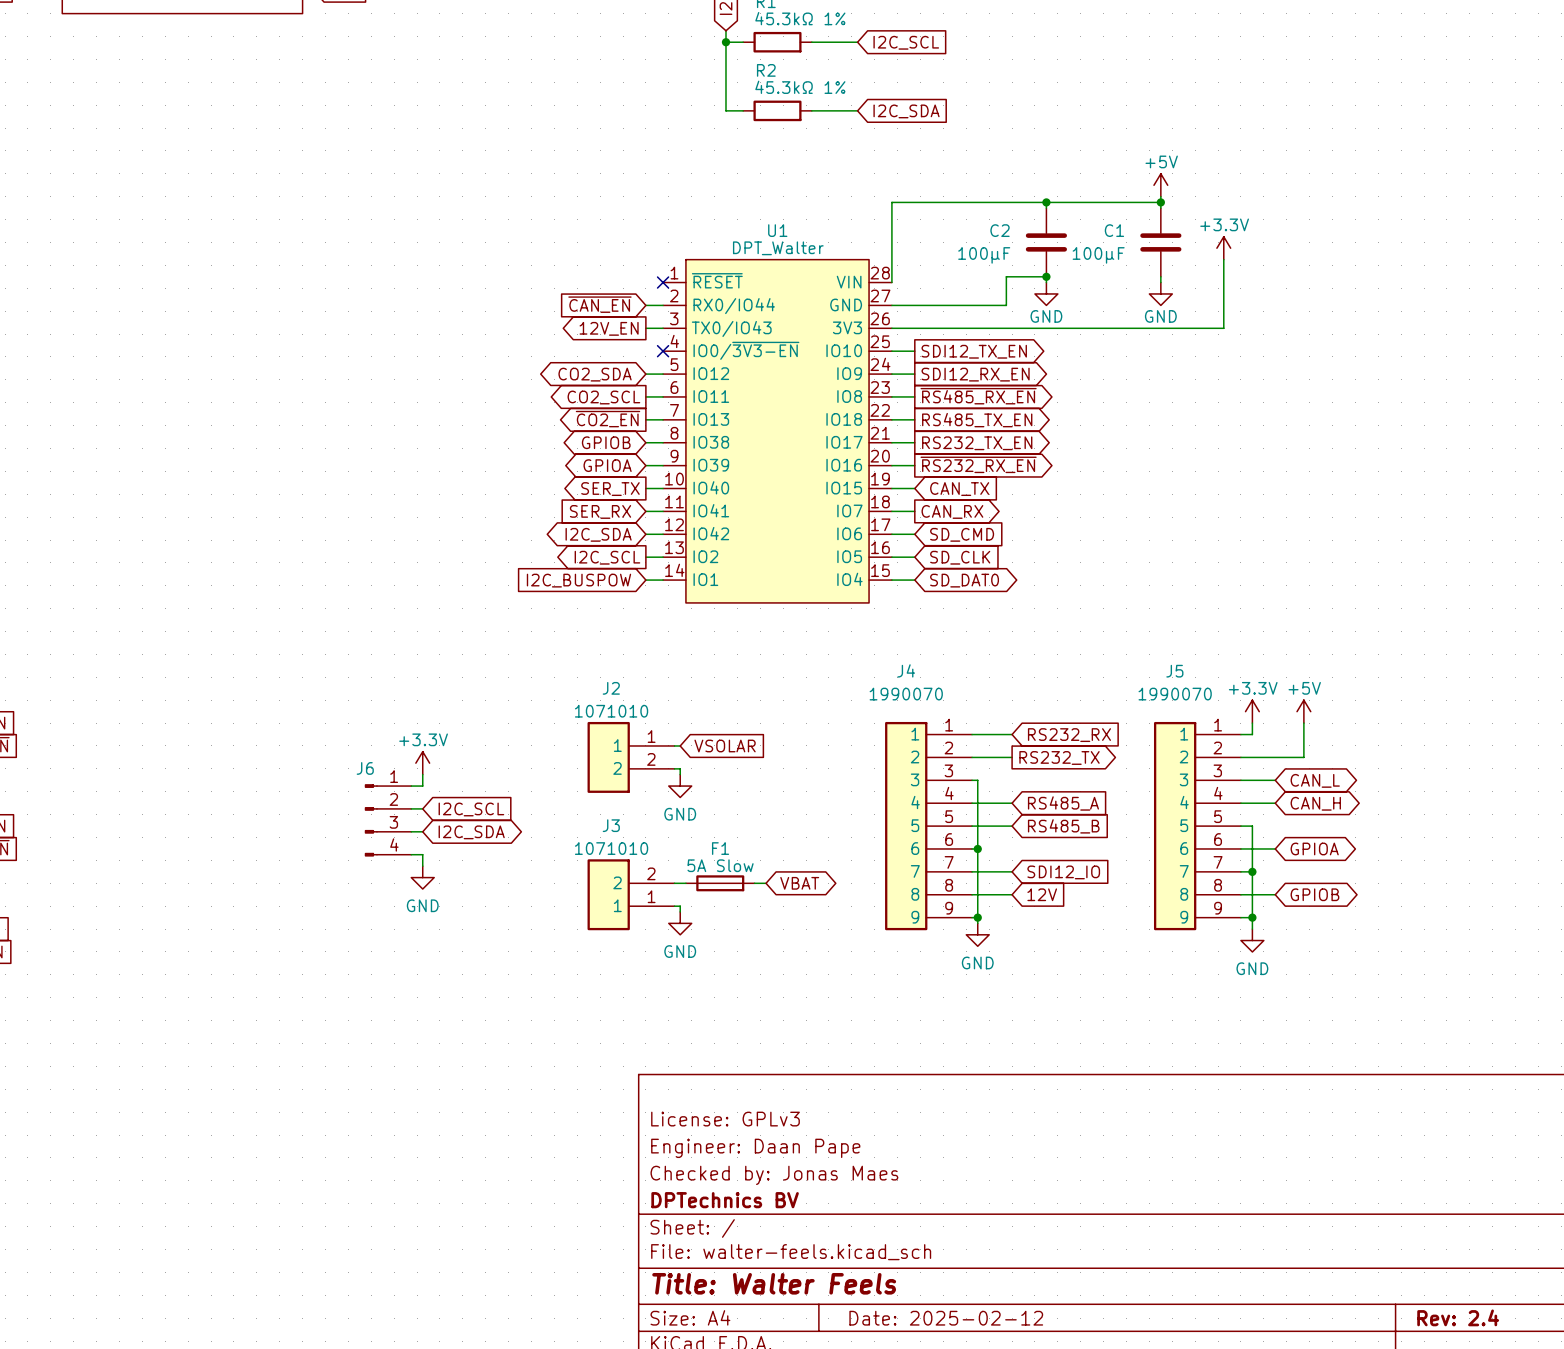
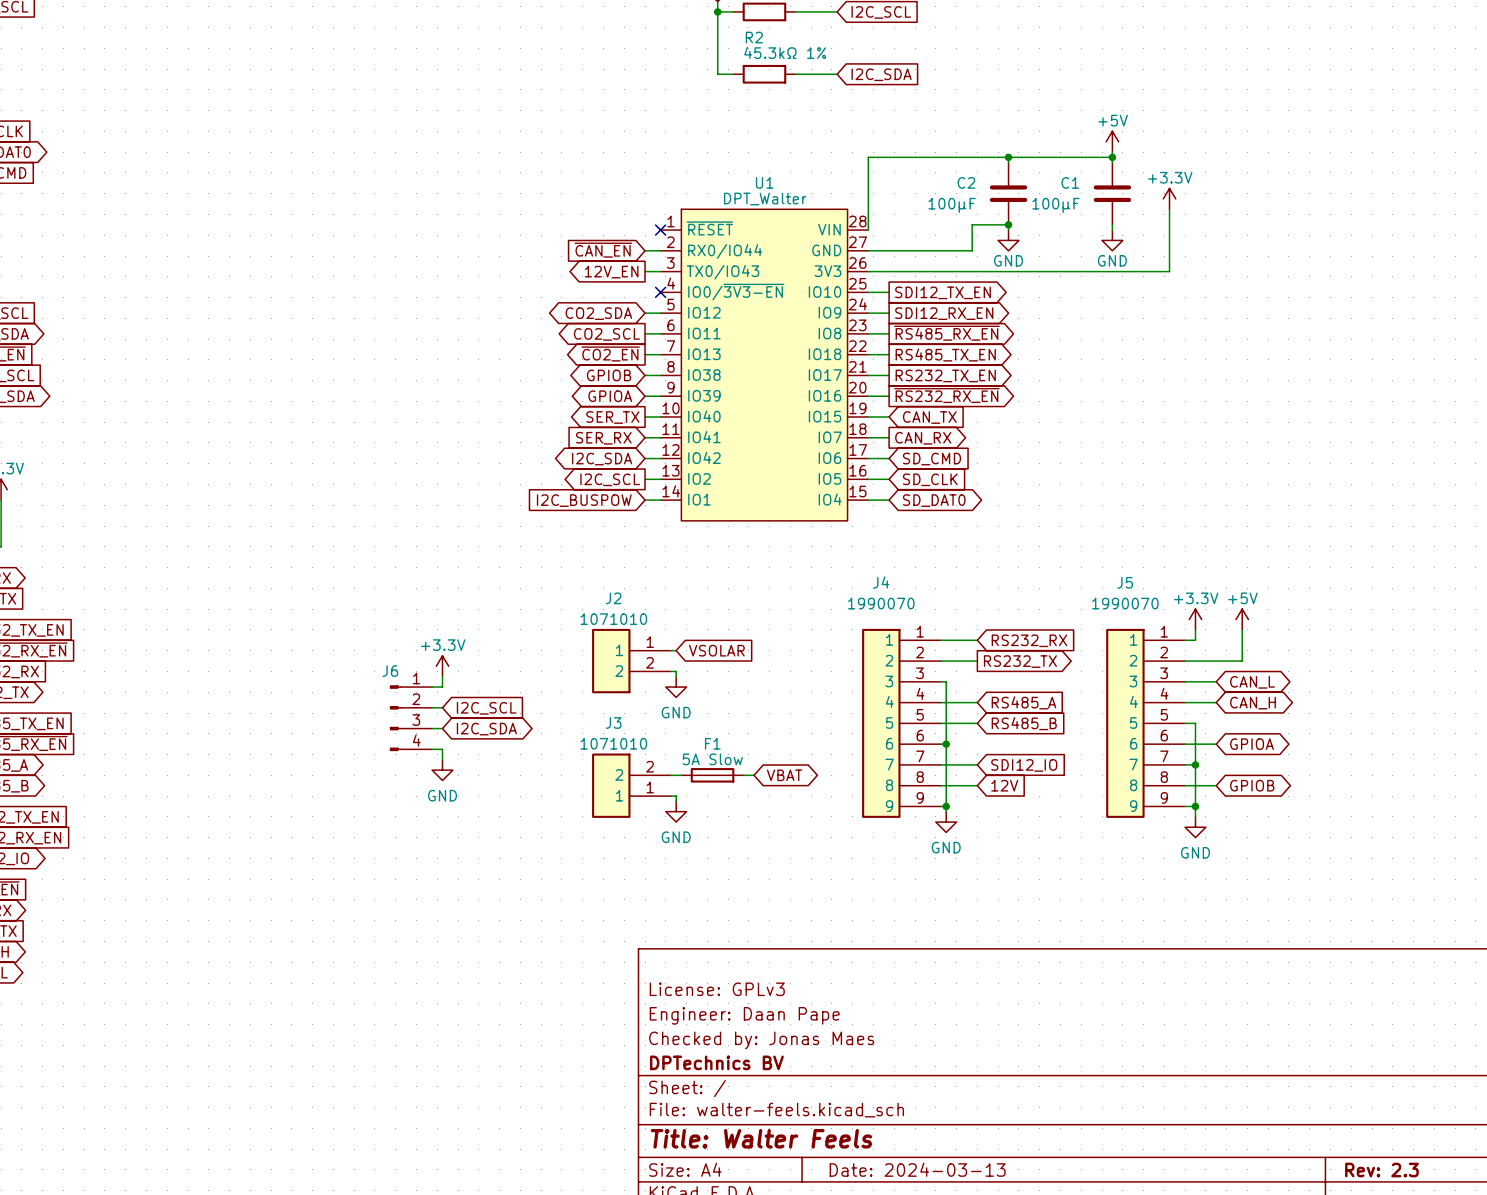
title block: Rev: 2.4 (1458, 1317) -> Rev: 2.3 (1381, 1170)
title block: Date: 2025-02-12 (946, 1318) -> Date: 2024-03-13 (917, 1169)

